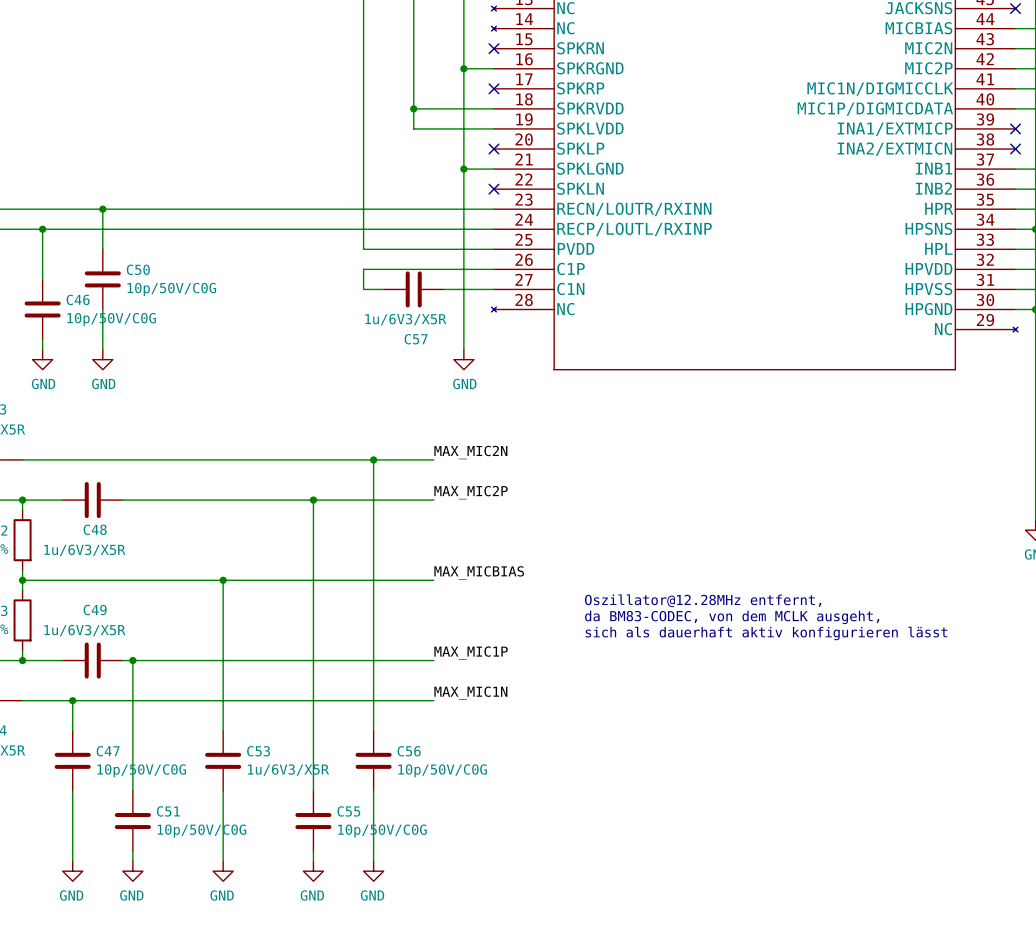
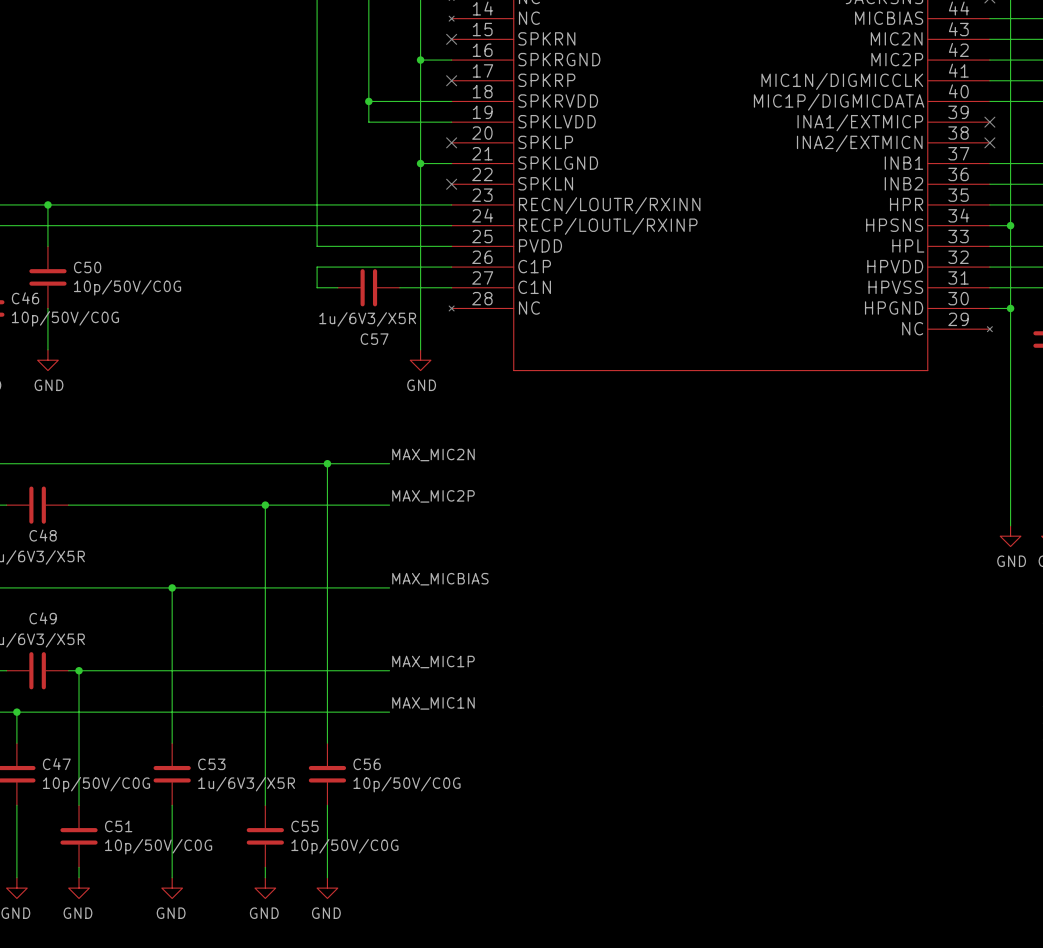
text: Oszillator@12.28MHz entfernt, (703, 600) -> none
text: da BM83-CODEC, von dem MCLK ausgeht, (732, 617) -> none
text: sich als dauerhaft aktiv konfigurieren lässt (766, 633) -> none

